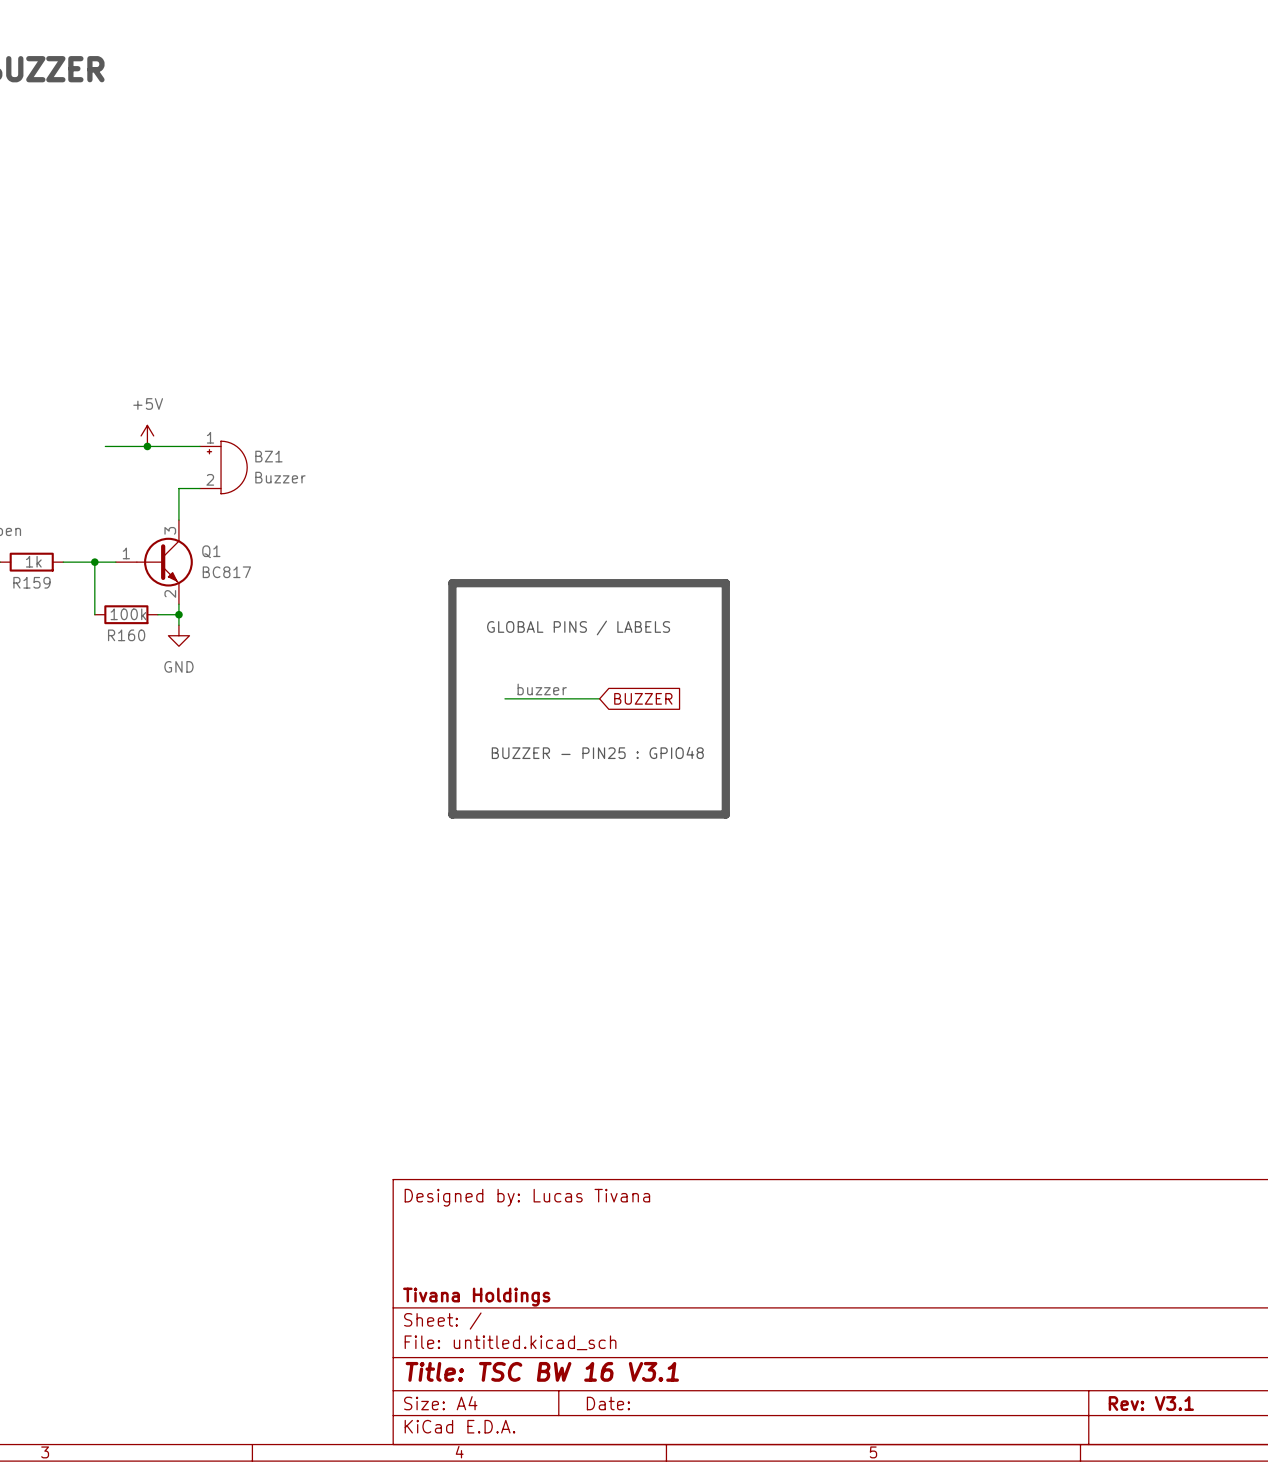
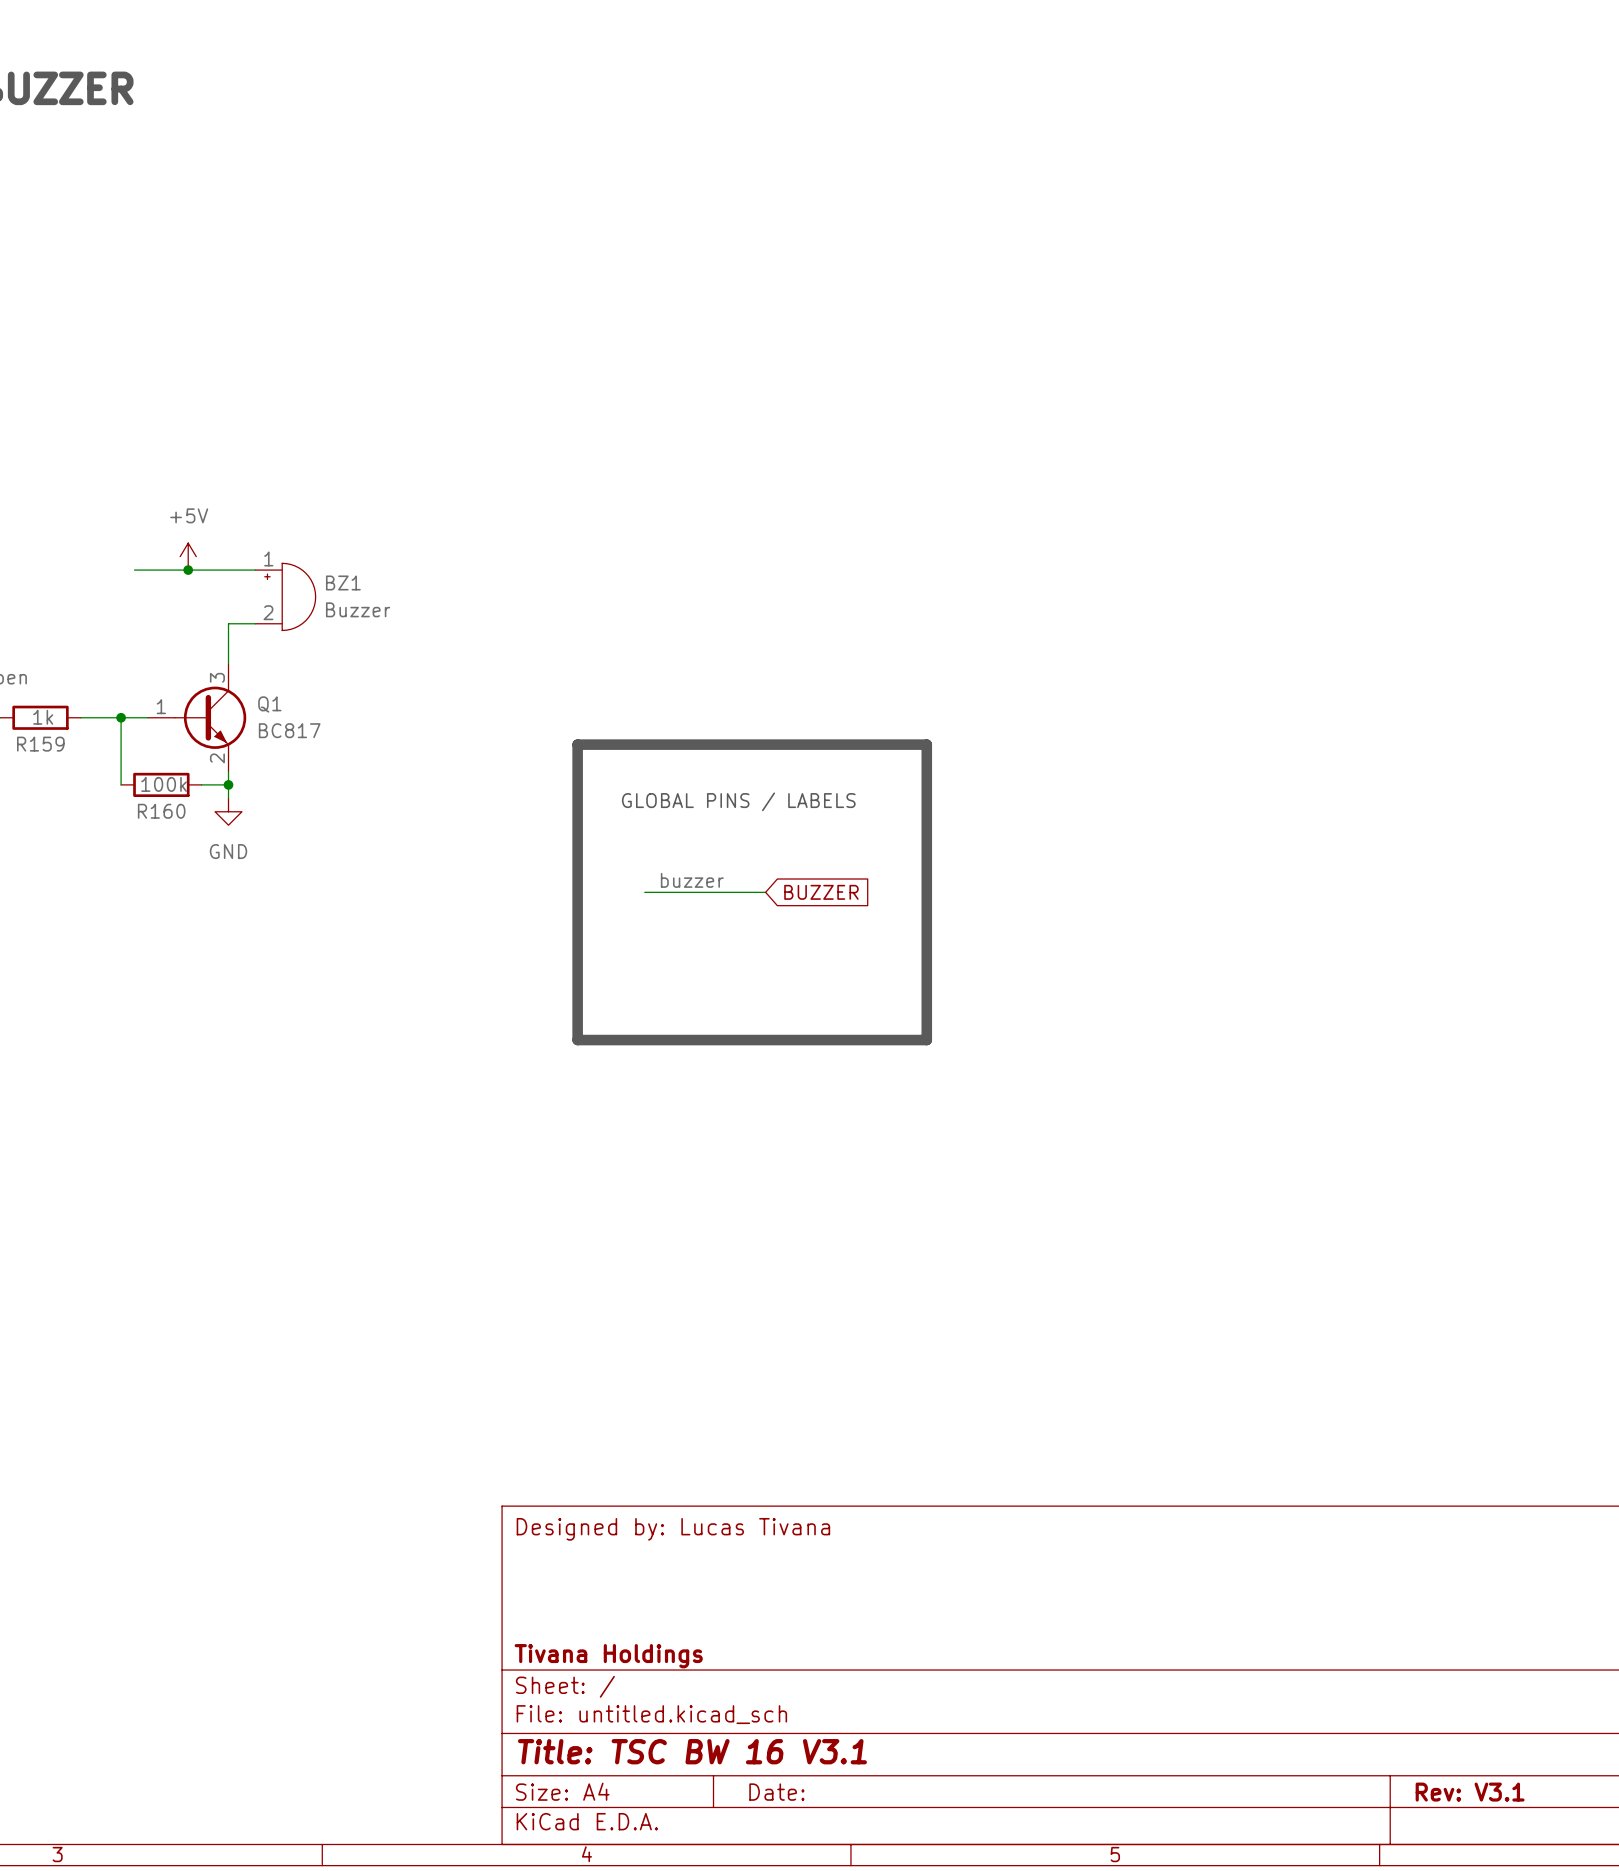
text: BUZZER - PIN25 : GPIO48 (597, 752) -> none

